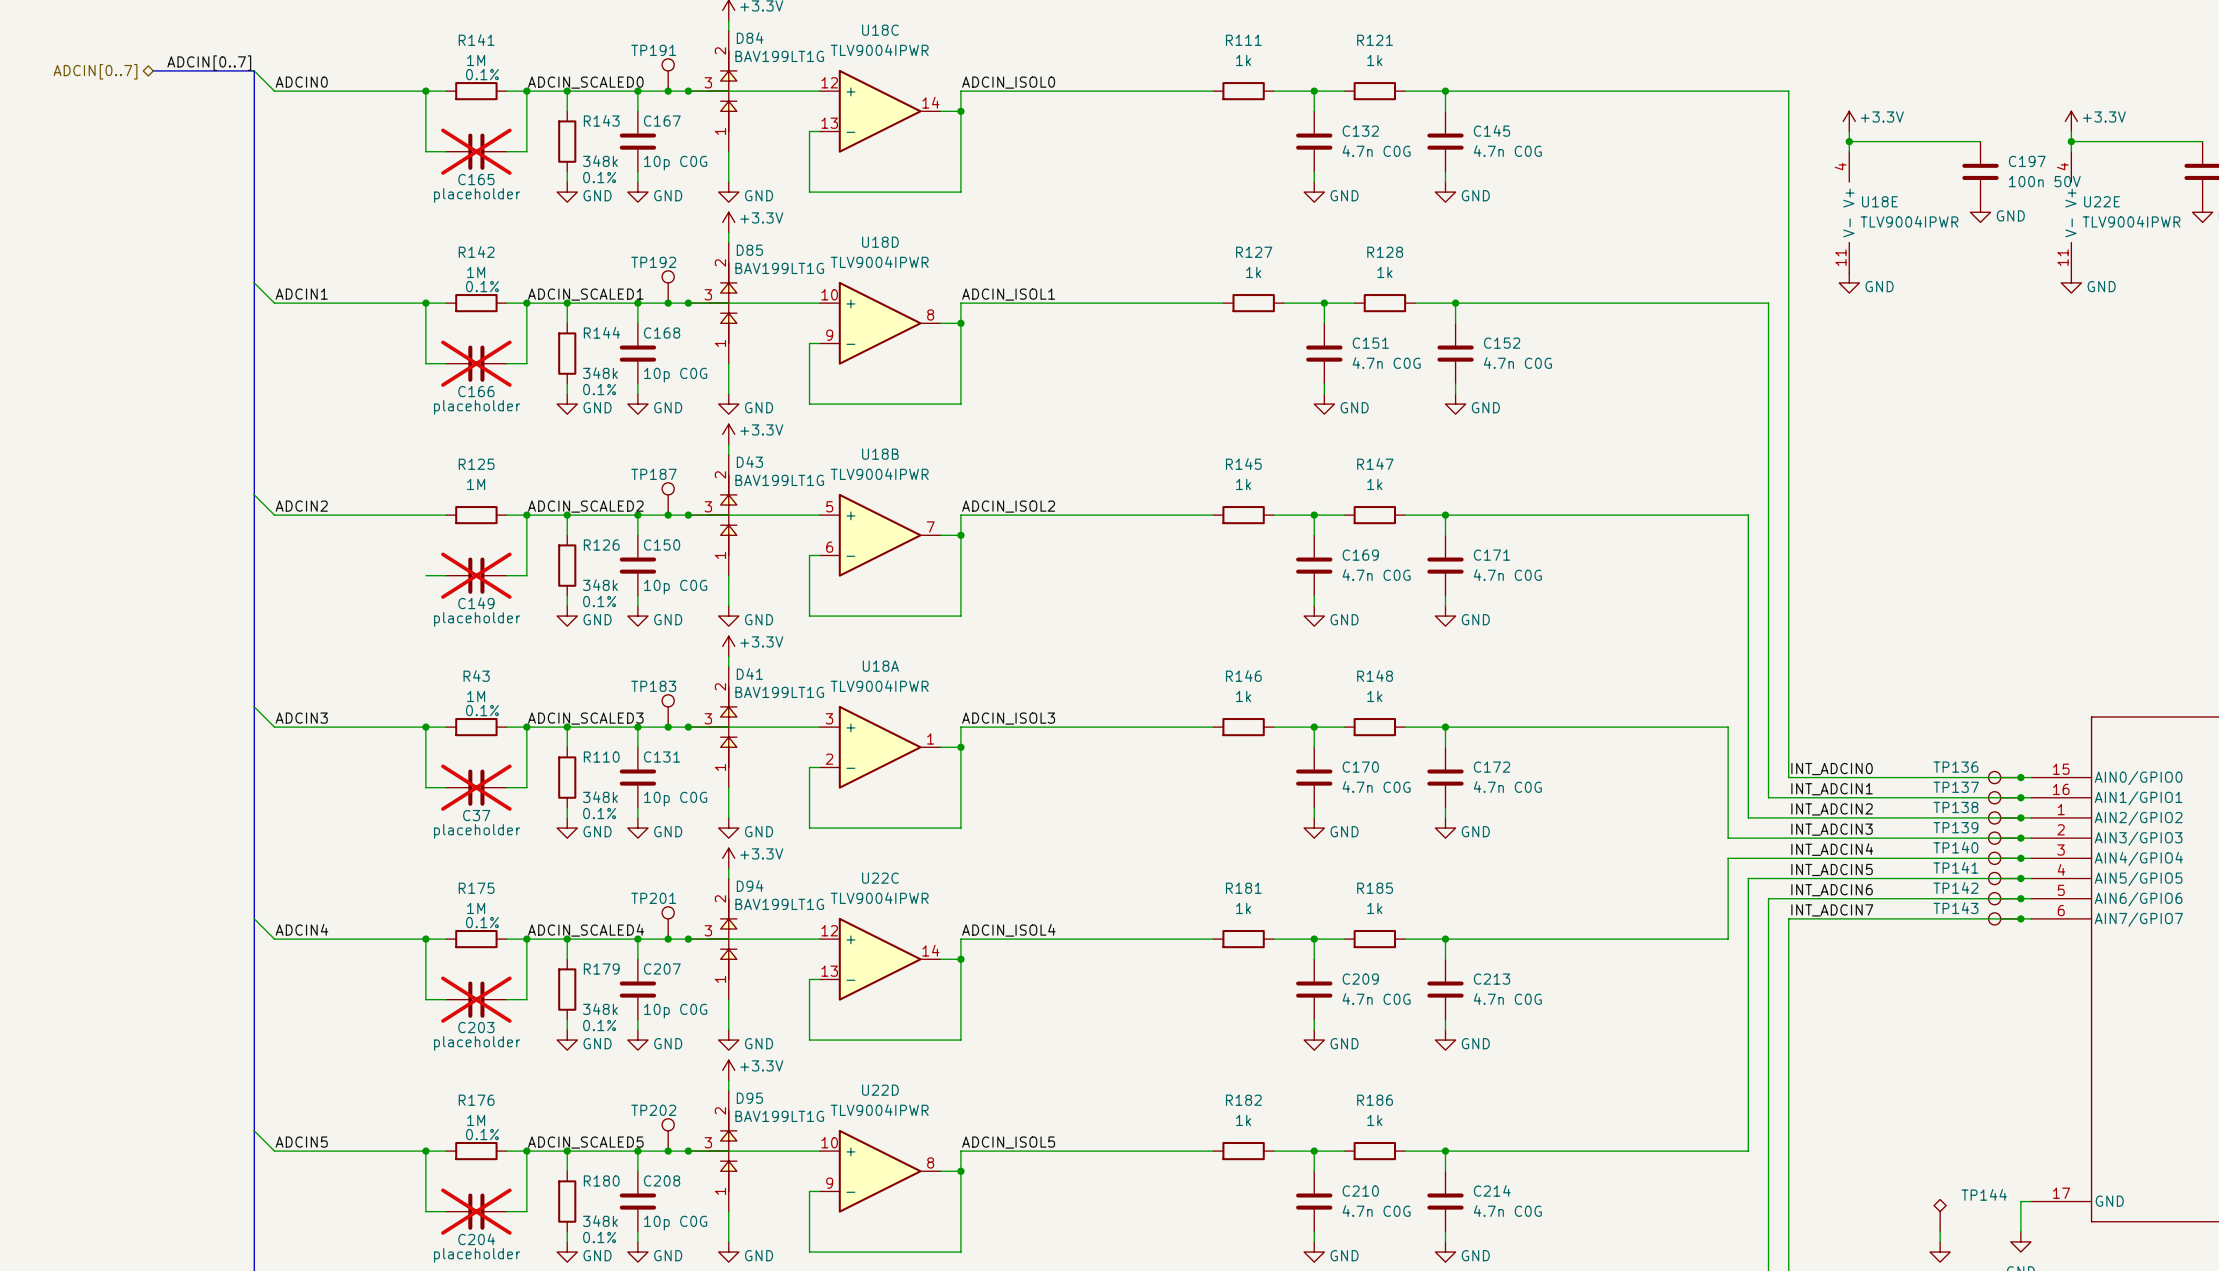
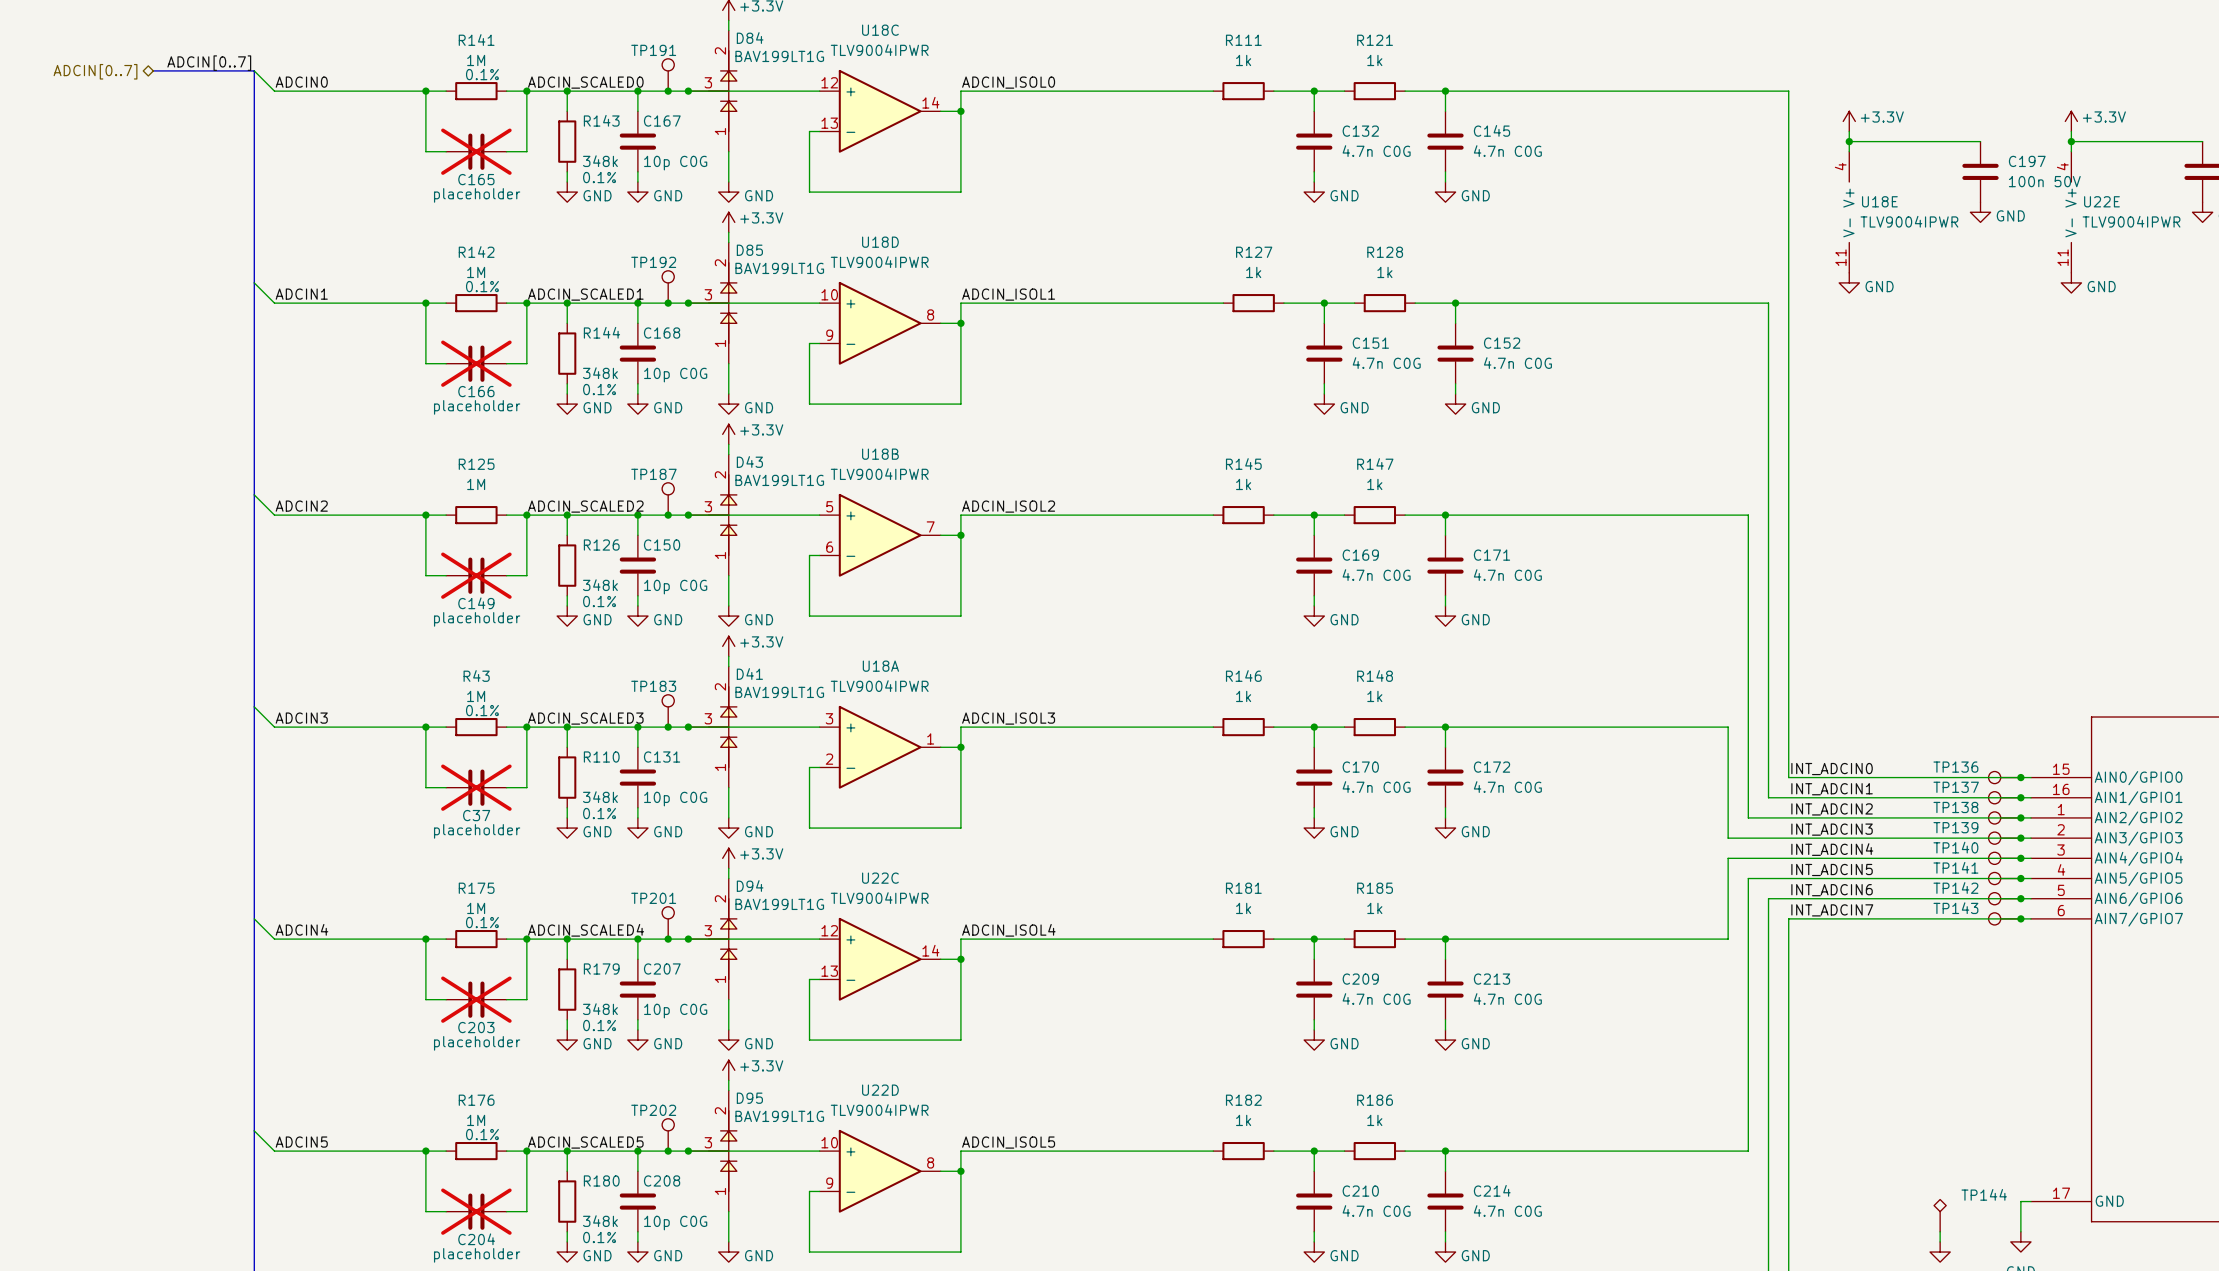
wire: none -> (425, 515) (425, 575)
junction: none -> (425, 515)

